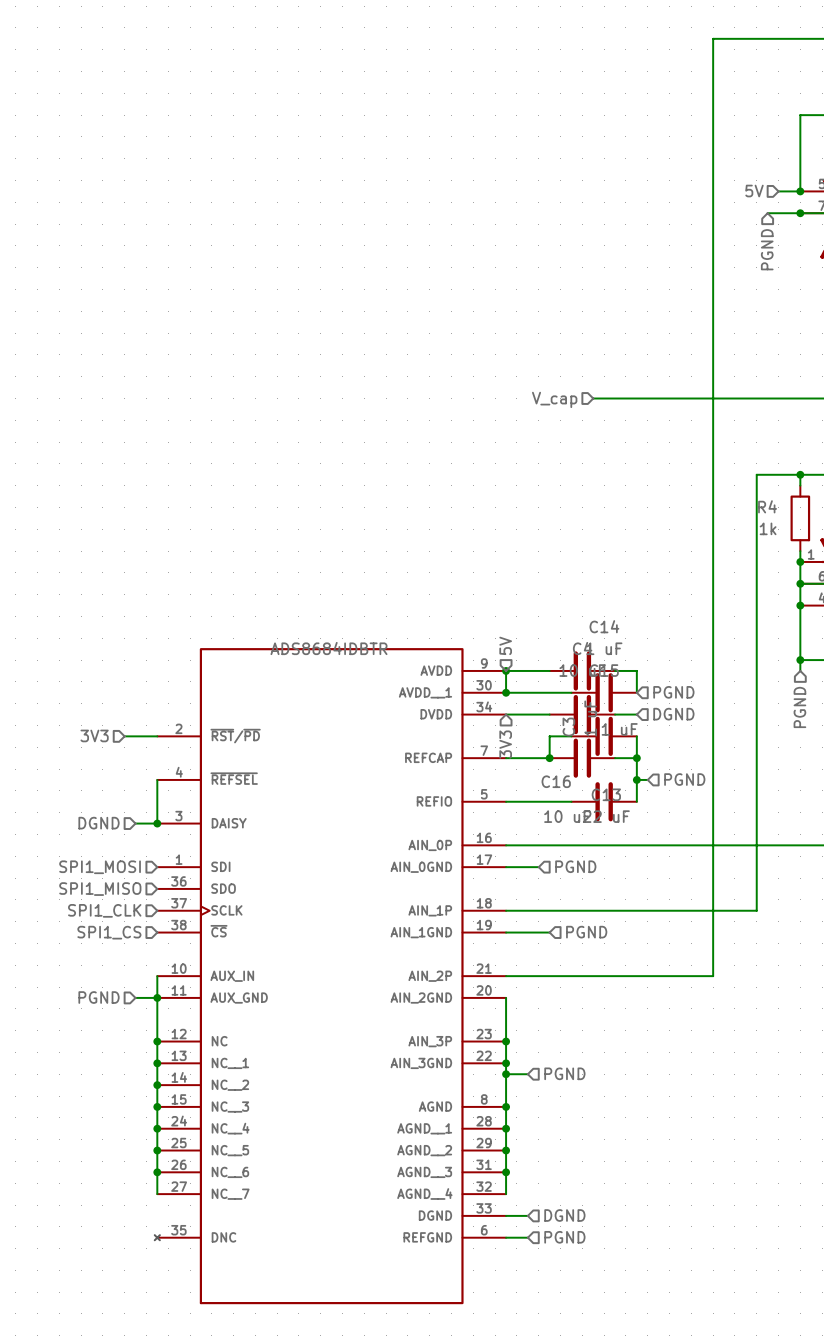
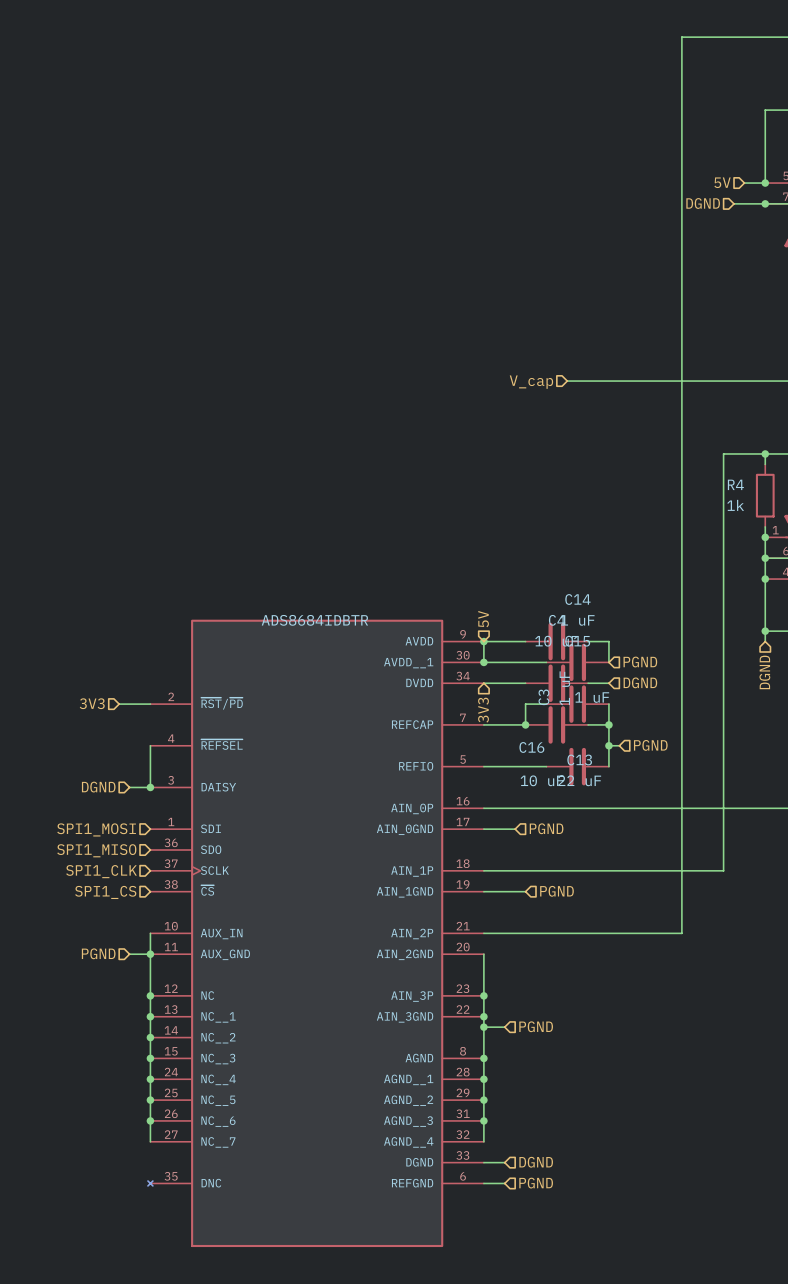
hierarchical label: none -> DGND (703, 203)
hierarchical label: PGND (767, 249) -> none
hierarchical label: PGND (799, 707) -> DGND (764, 672)

